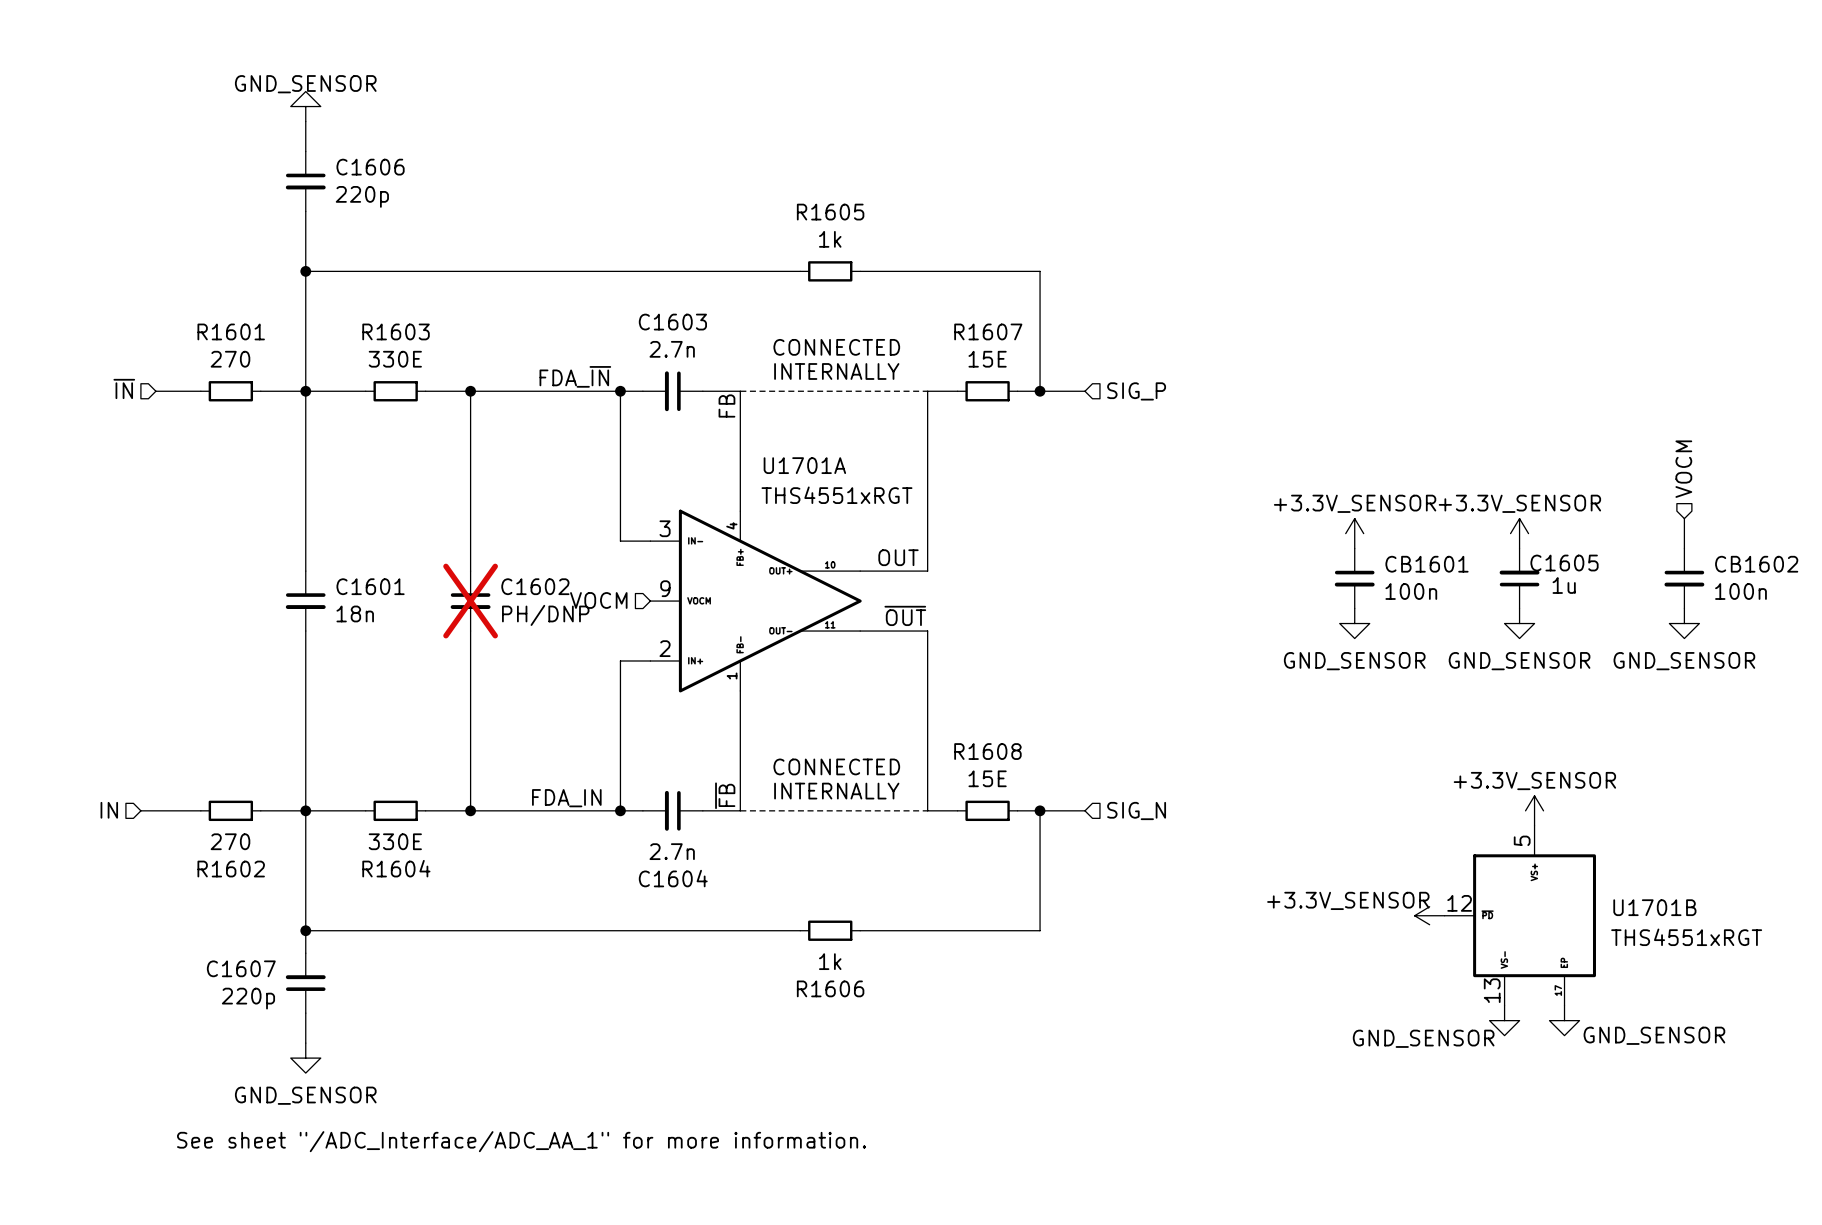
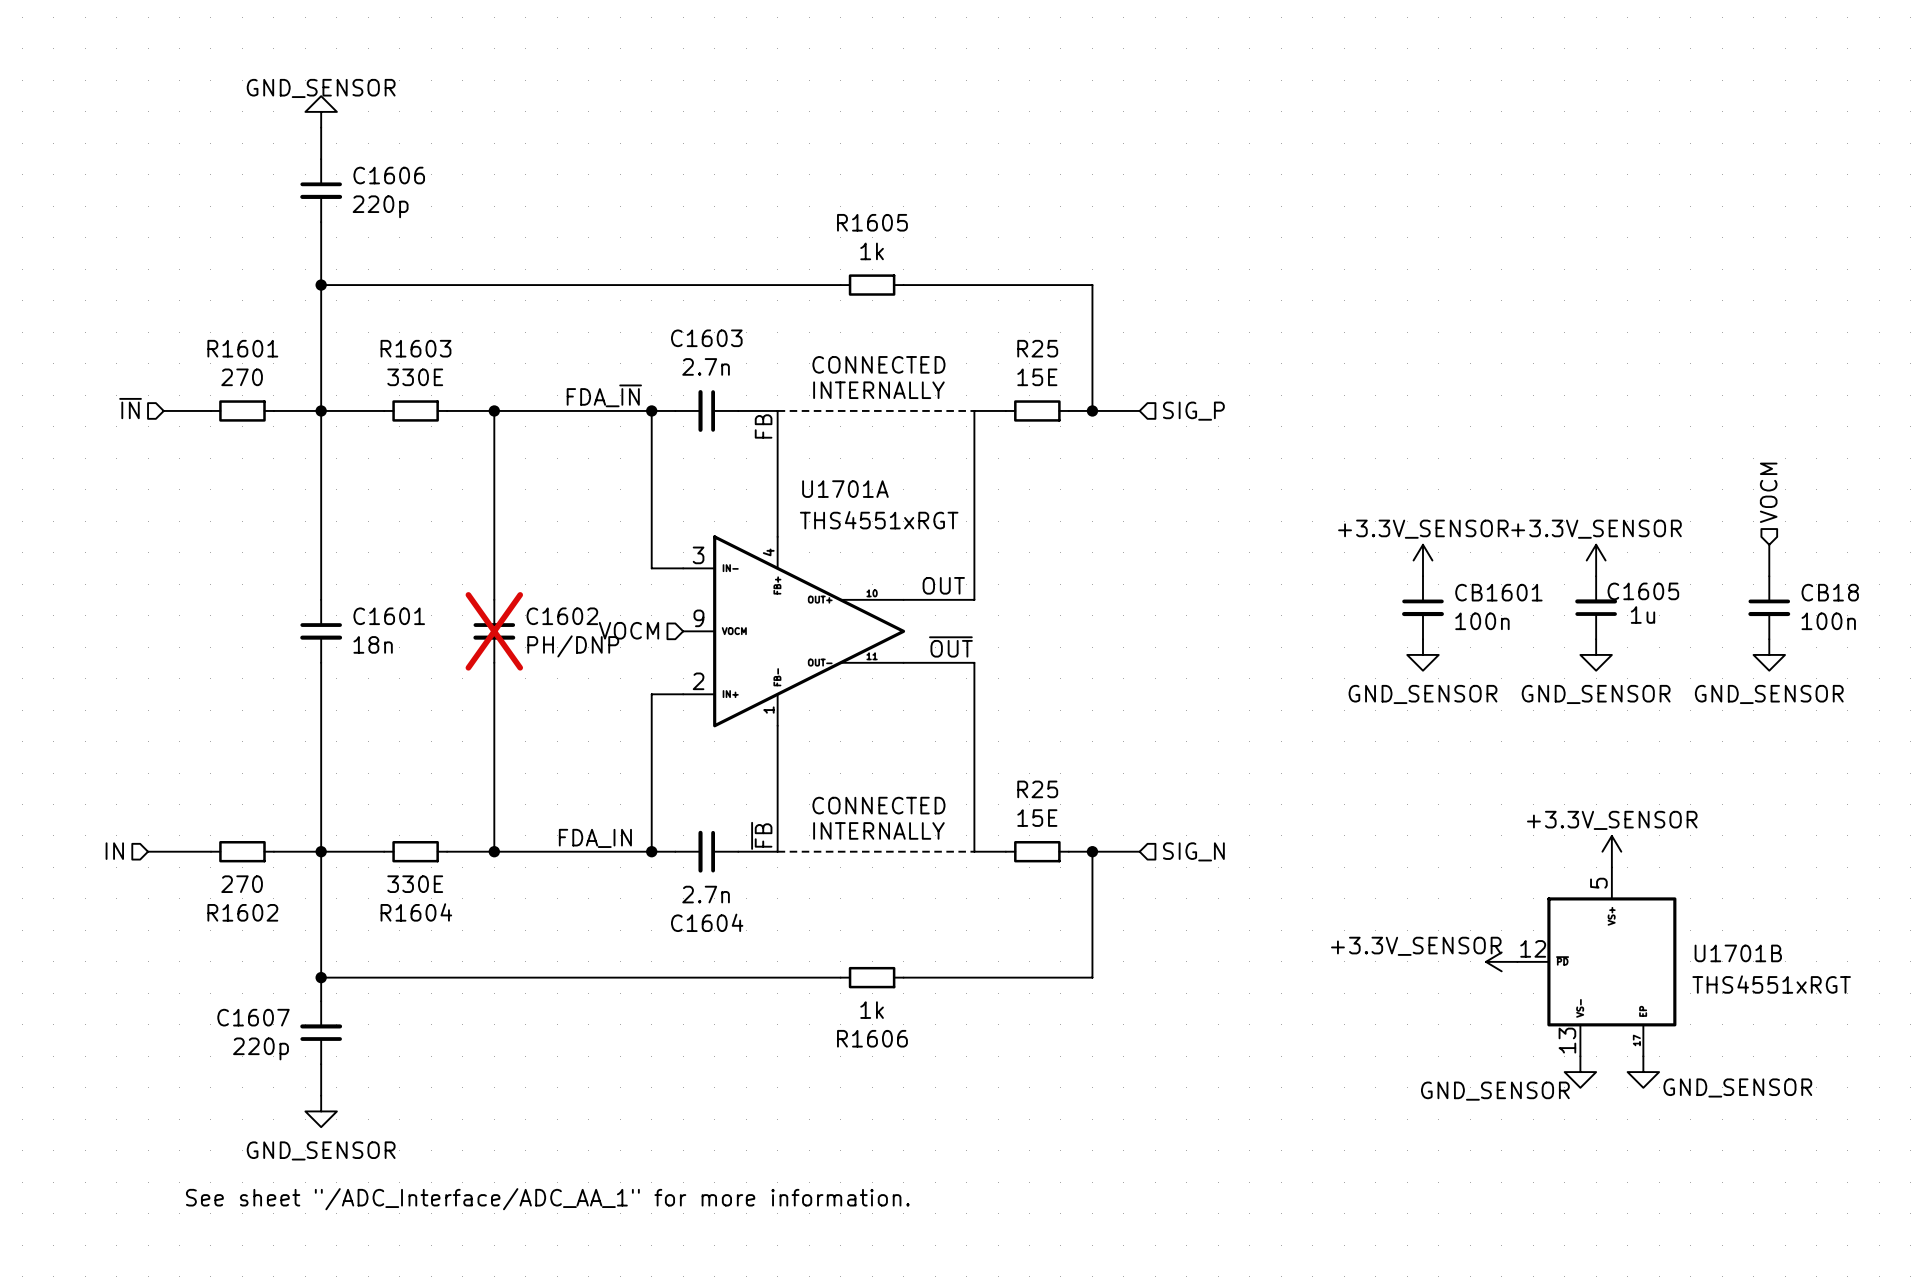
R1607 name: R1607 (988, 331) -> R25 (1037, 348)
CB1602 name: CB1602 (1756, 564) -> CB18 (1830, 592)
R1608 name: R1608 (987, 751) -> R25 (1037, 789)

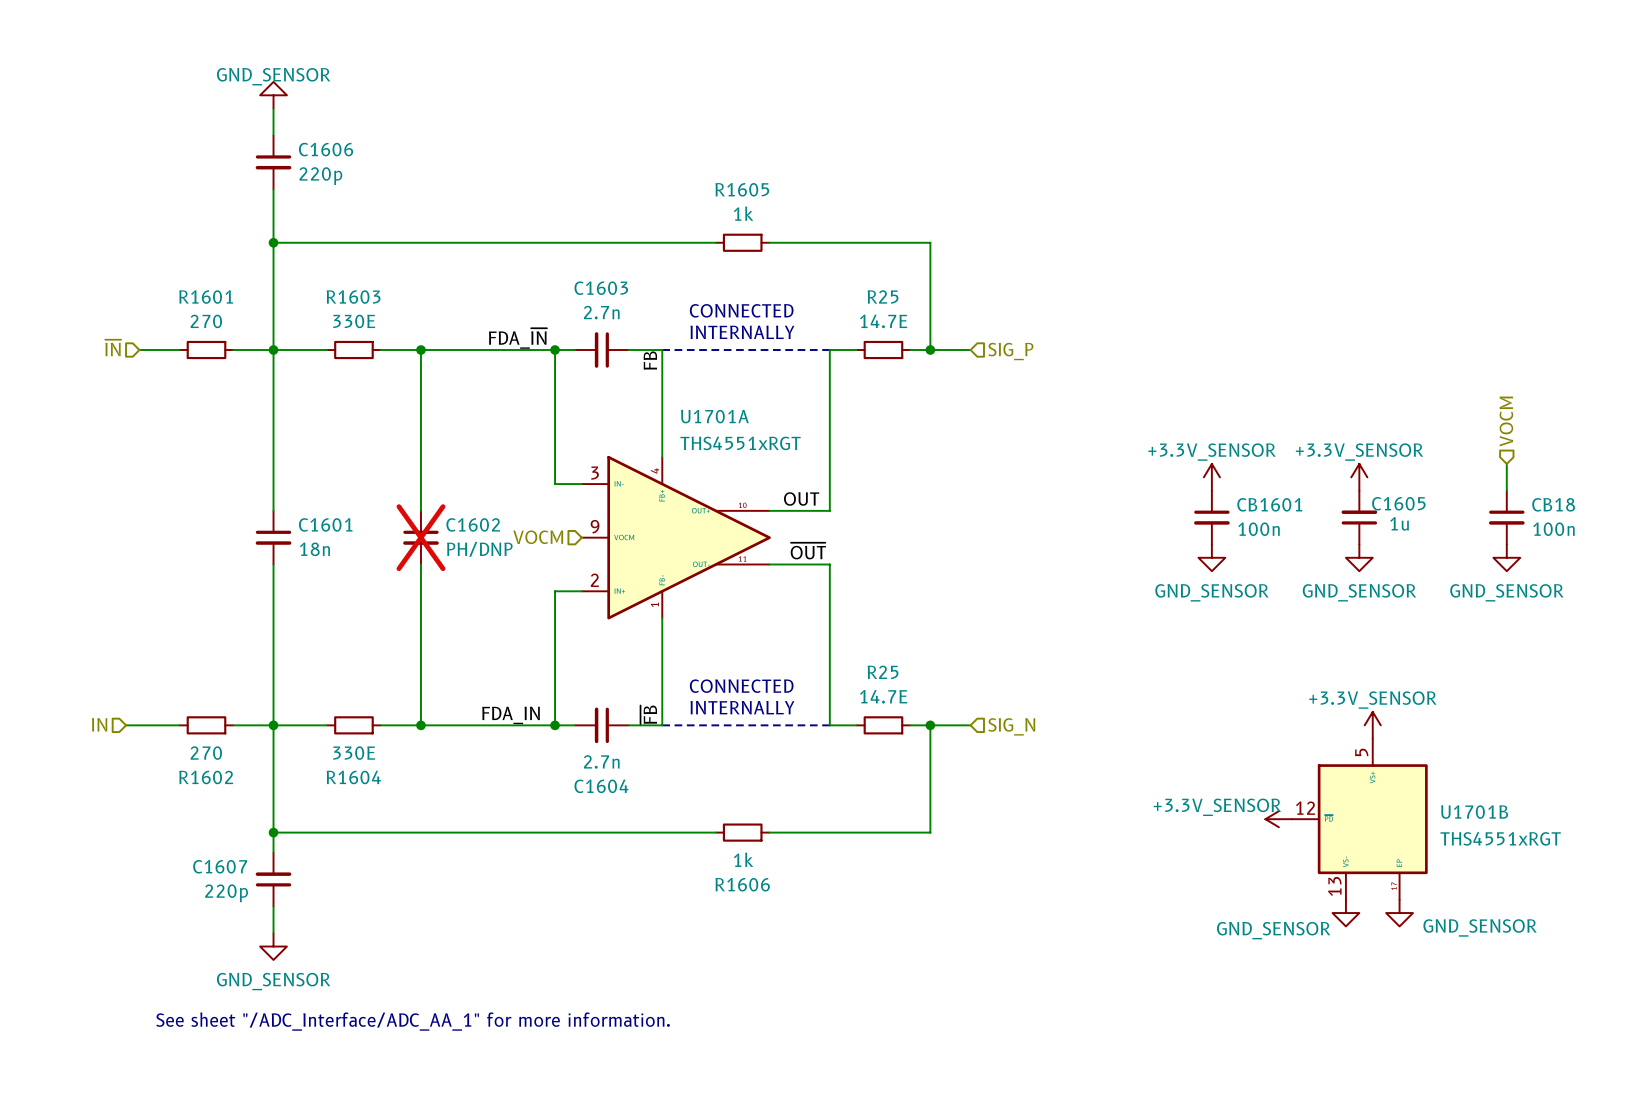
R25 value: 15E (1037, 377) -> 14.7E (883, 321)
R25 value: 15E (1037, 818) -> 14.7E (883, 696)

